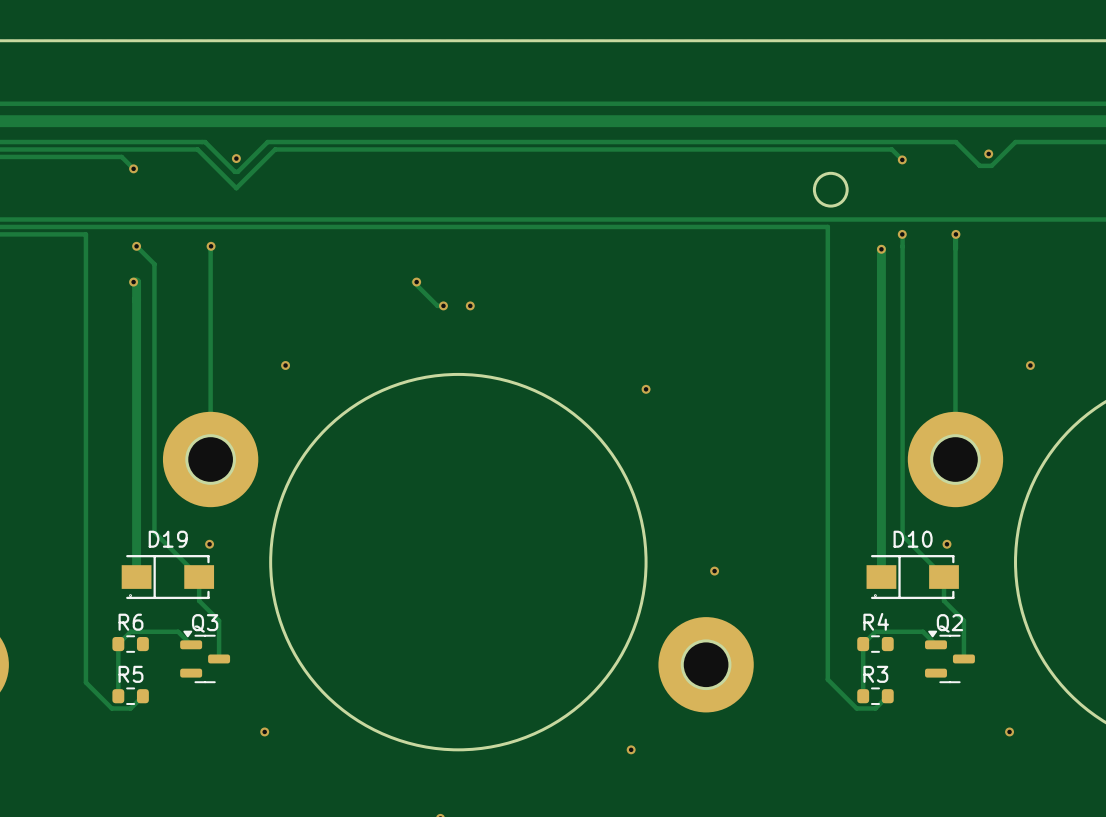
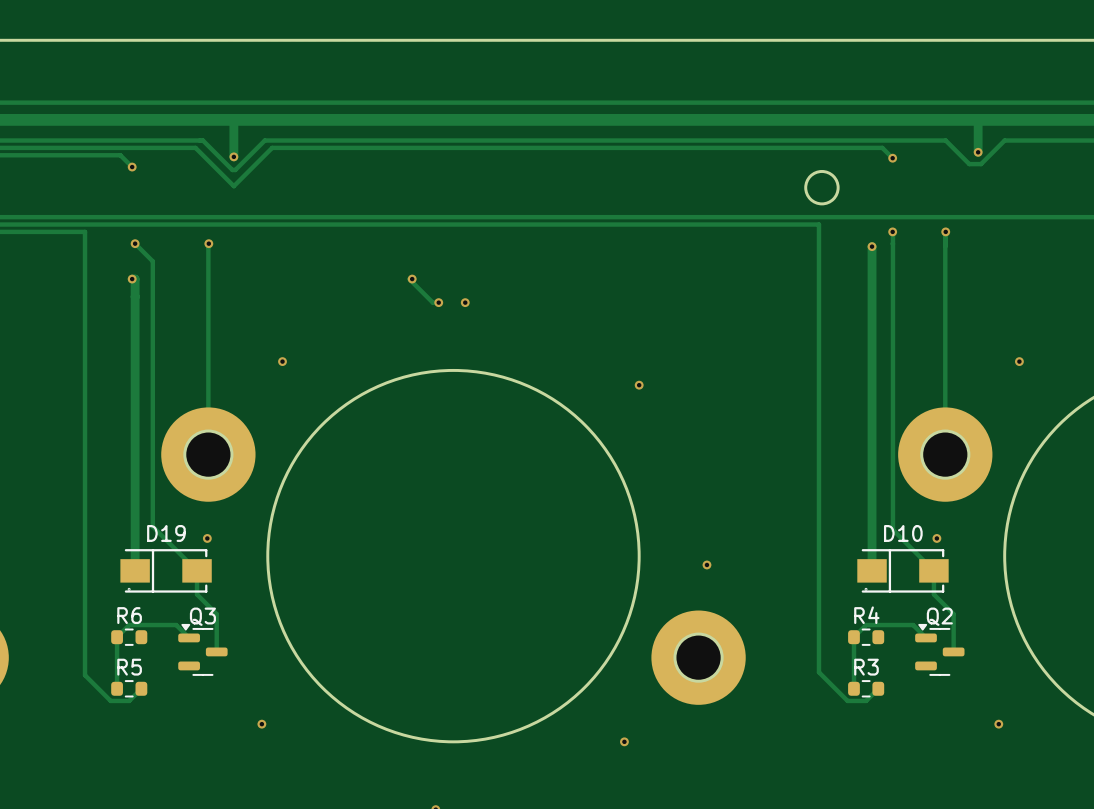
track: none -> (232, 119) (233, 156)
track: none -> (978, 119) (978, 152)

